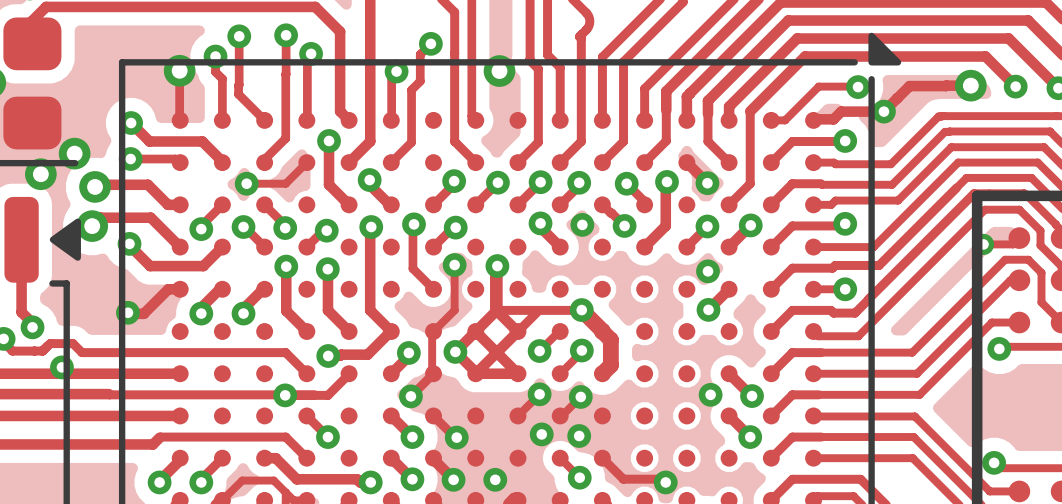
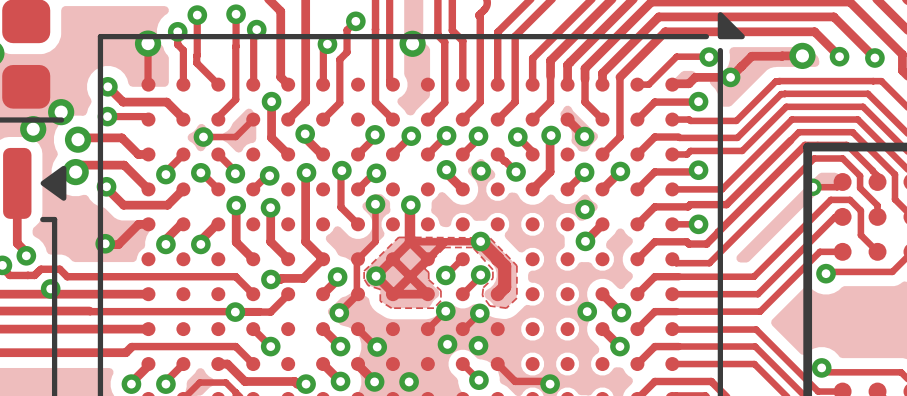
zone outline: none -> (414, 237) (471, 237) (490, 238) (516, 265) (516, 298) (506, 308) (489, 305) (482, 295) (483, 287) (492, 278) (492, 269) (472, 247) (444, 247) (424, 268) (428, 272) (428, 279) (440, 290) (440, 300) (433, 308) (391, 308) (380, 301) (380, 289) (368, 285) (364, 278) (364, 271) (398, 237) (415, 237)

